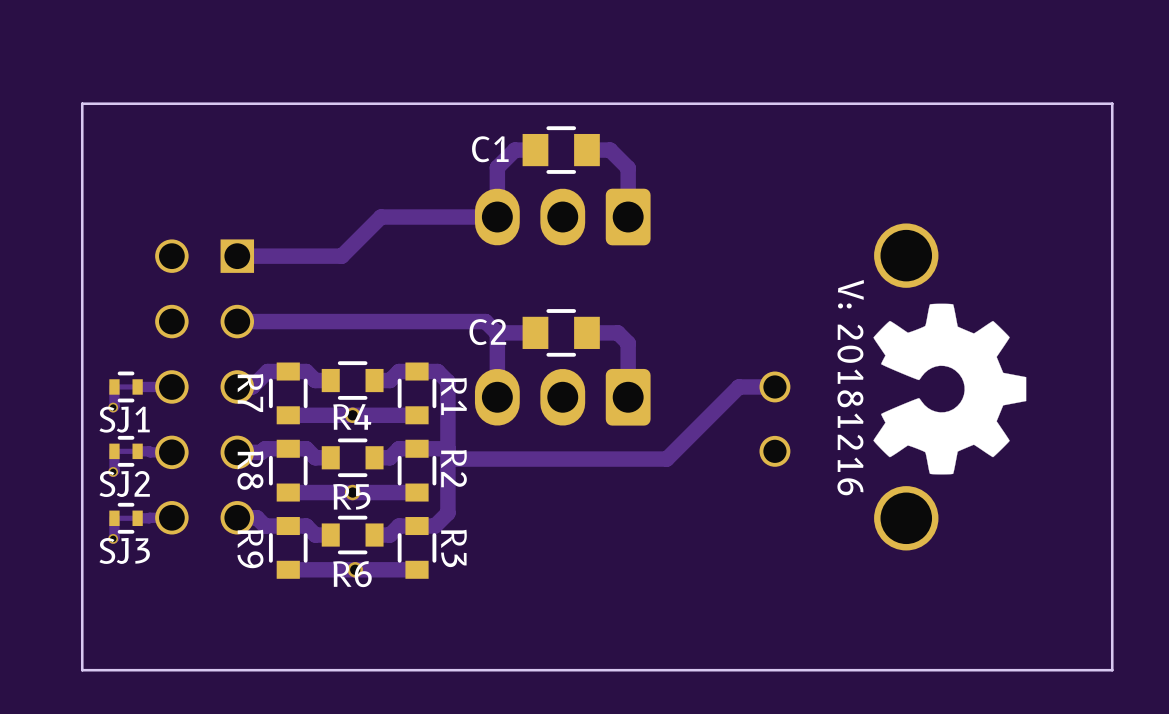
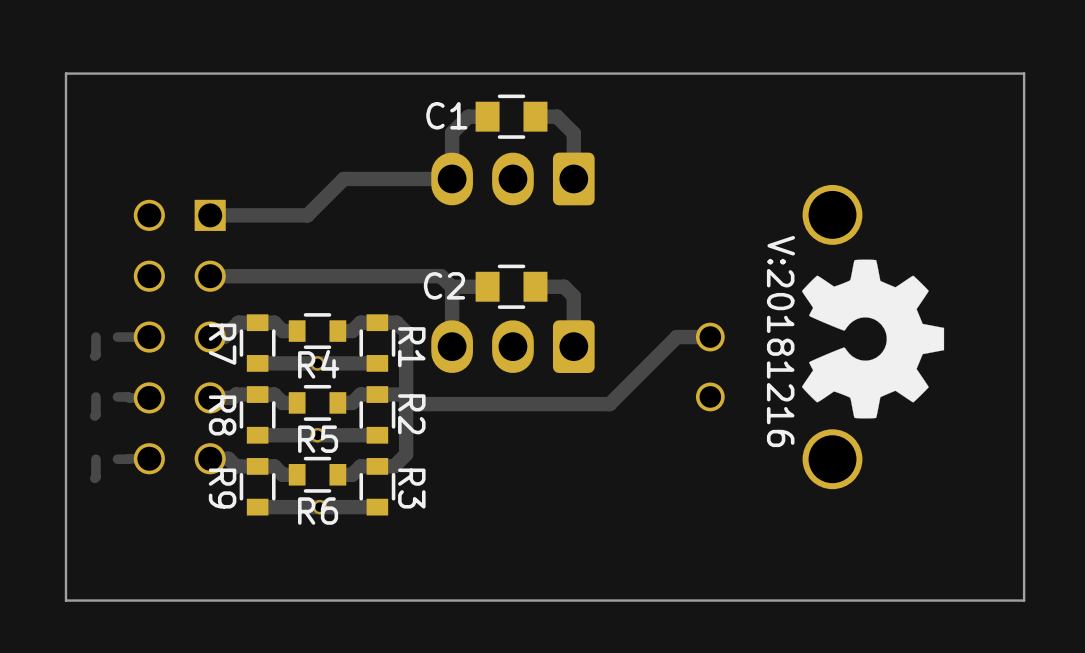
SJ1: (126, 386) -> none
via: (113, 407) -> none
SJ2: (126, 451) -> none
via: (113, 471) -> none
SJ3: (126, 518) -> none
via: (113, 538) -> none

